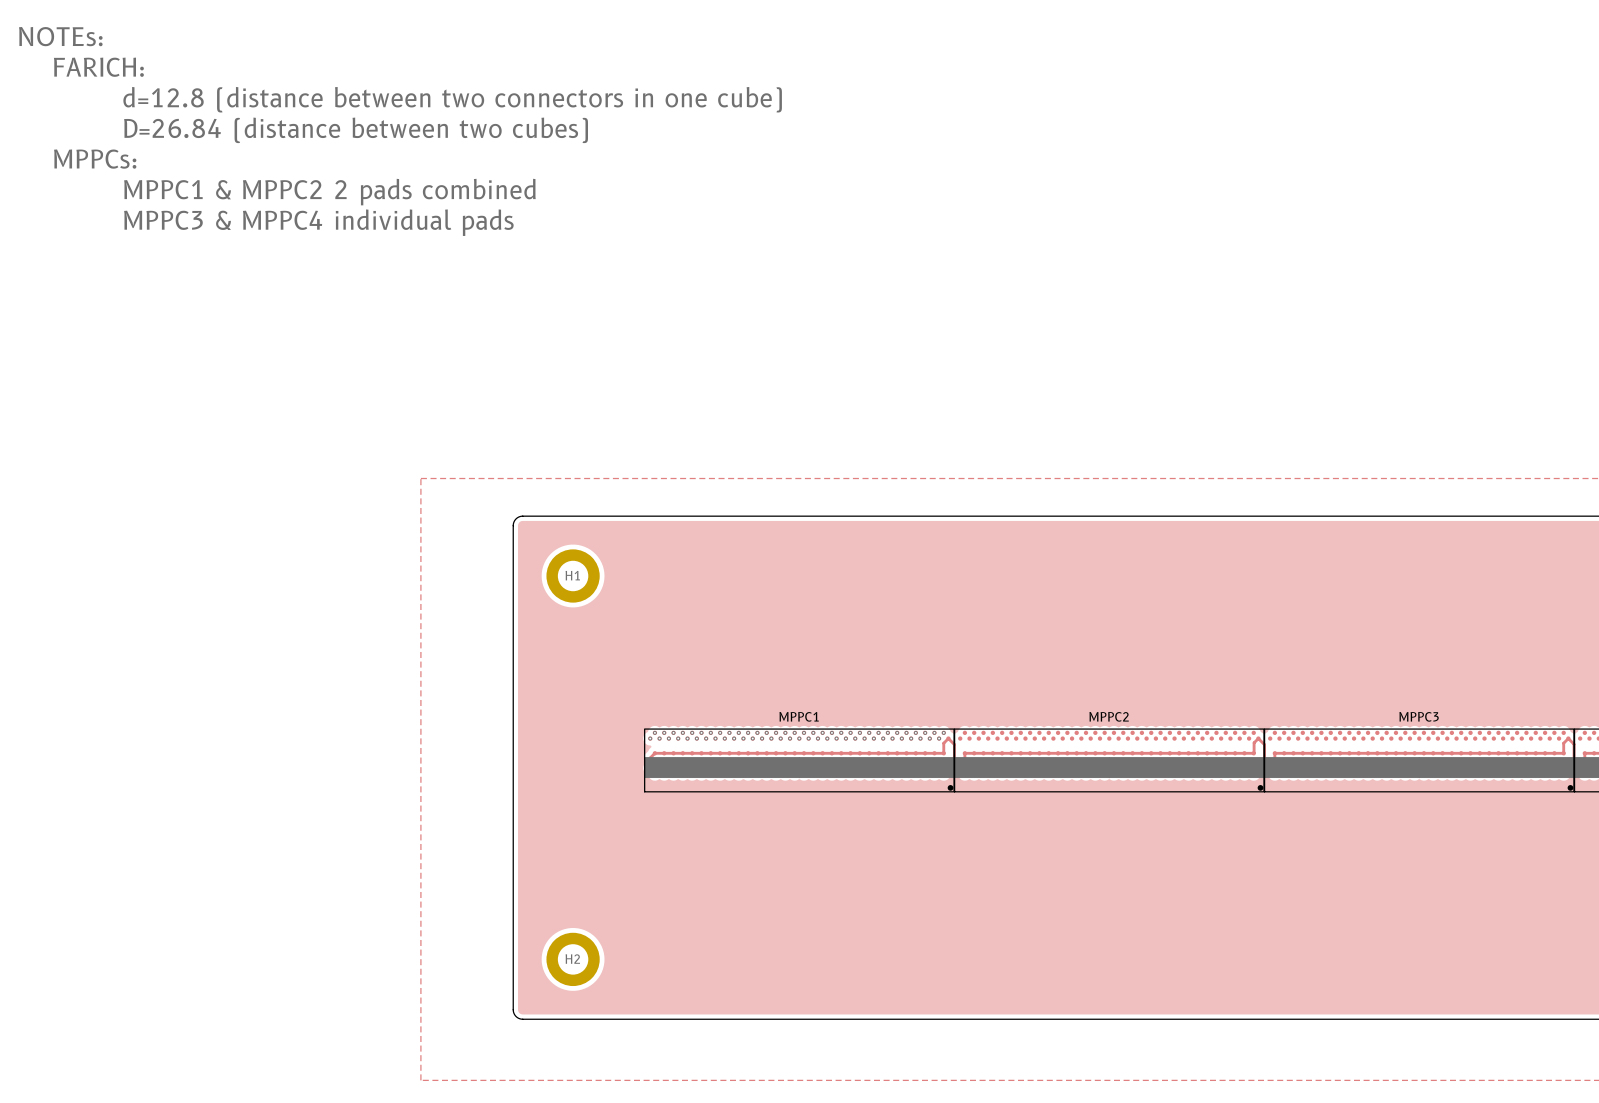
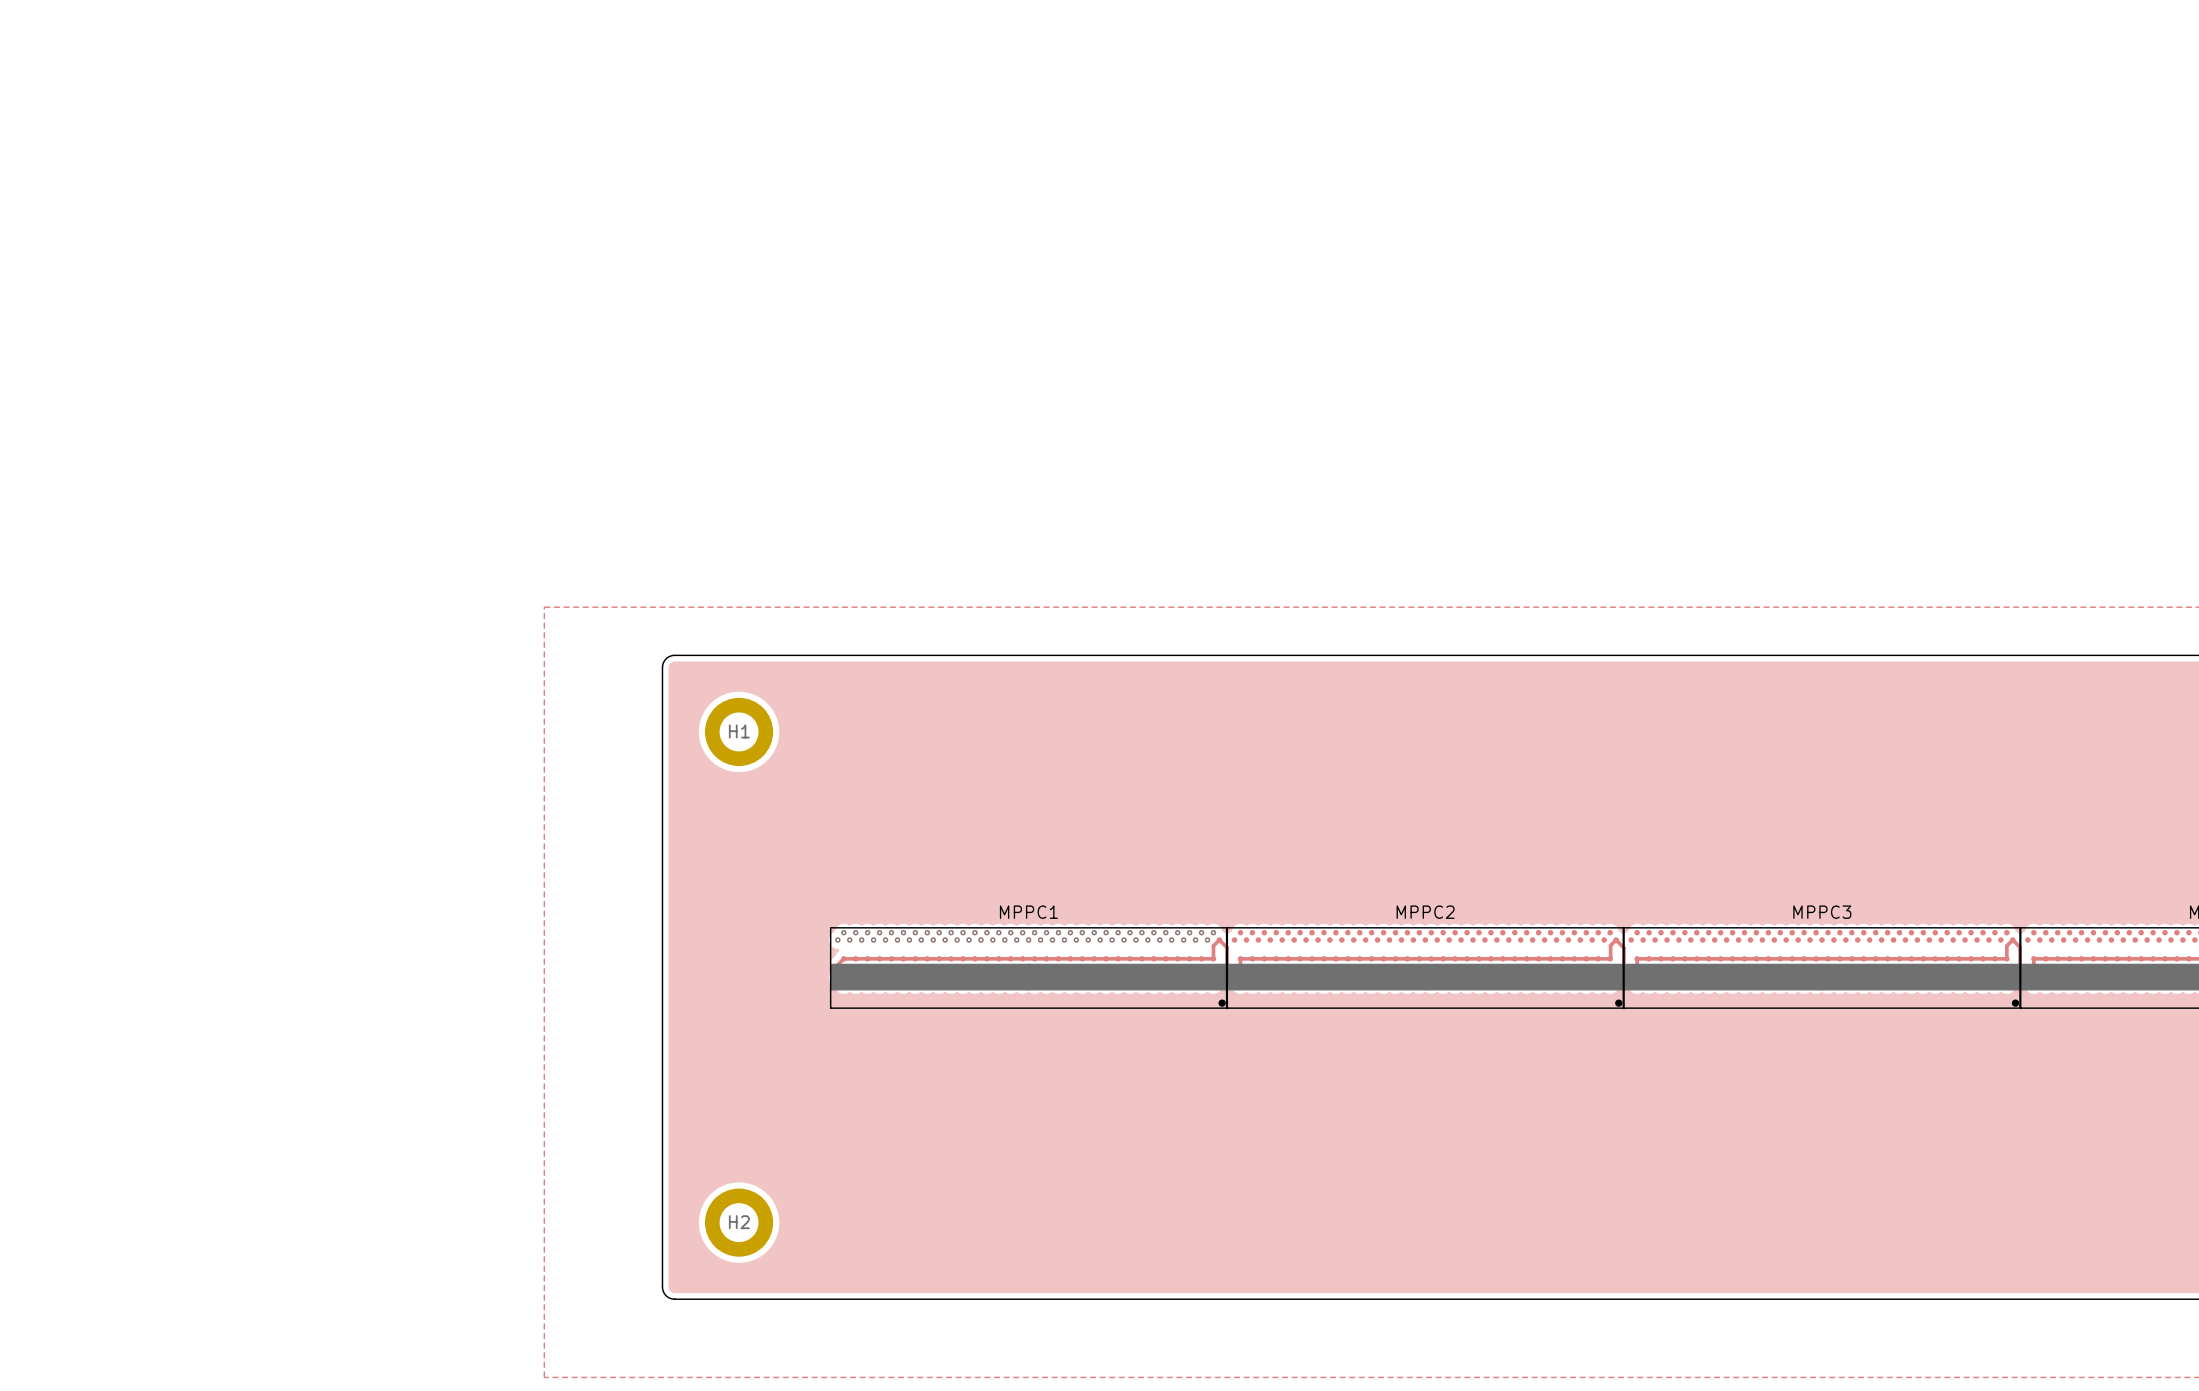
text: NOTEs: (60, 36) -> none
text: FARICH: (98, 67) -> none
text: d=12.8 (distance between two connectors in one cube) (452, 99) -> none
text: D=26.84 (distance between two cubes) (356, 130) -> none
text: MPPCs: (95, 159) -> none
text: MPPC1 & MPPC2 2 pads combined (329, 192) -> none
text: MPPC3 & MPPC4 individual pads (318, 222) -> none

